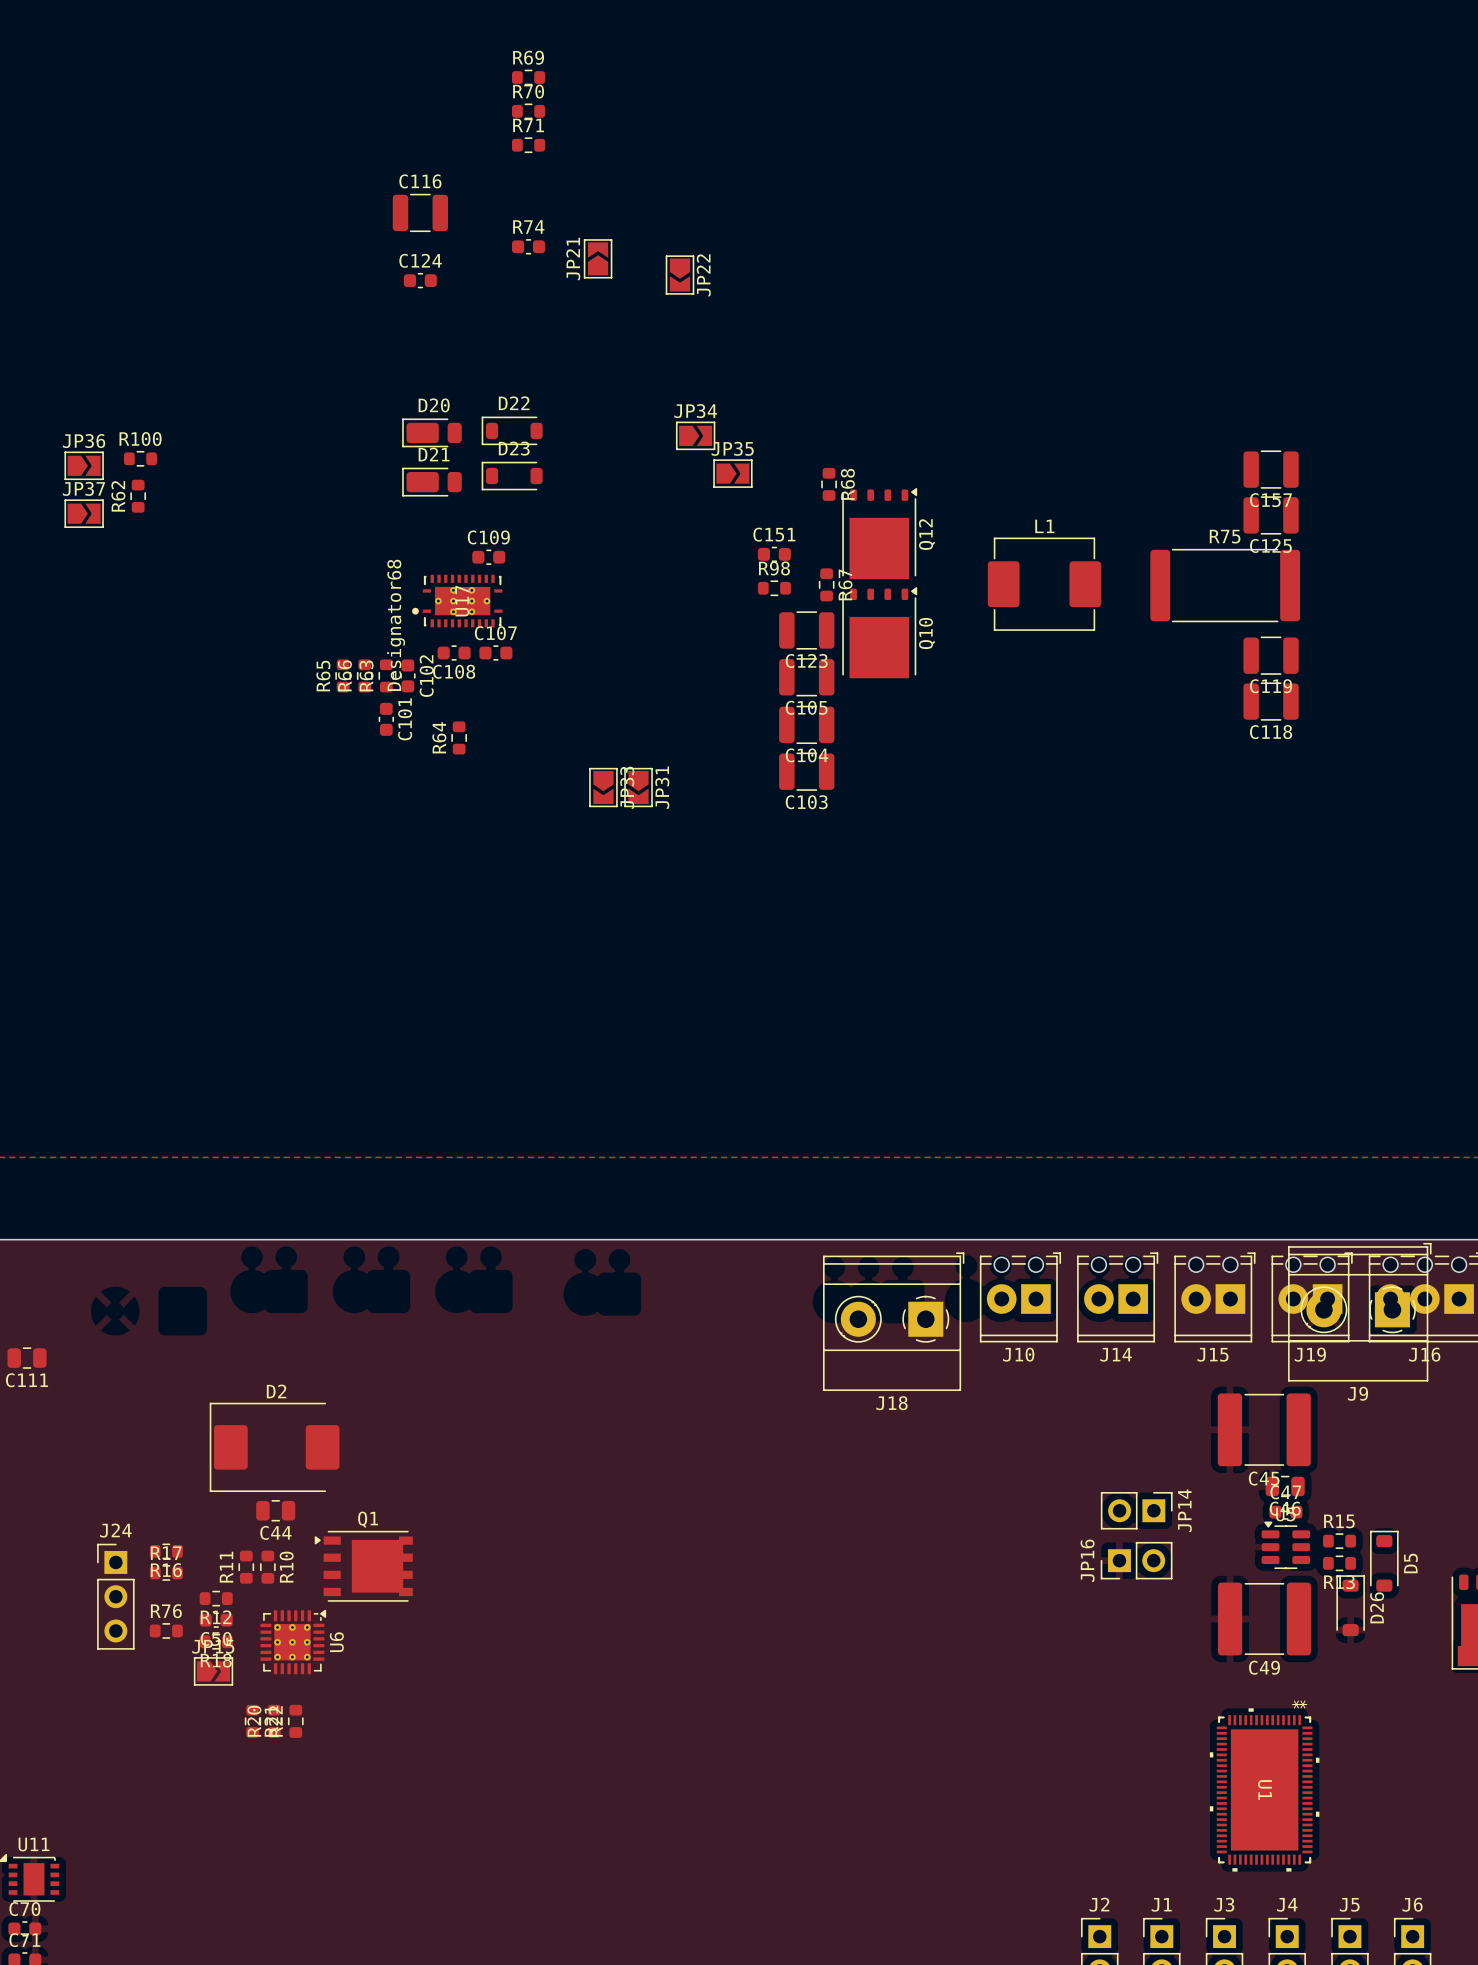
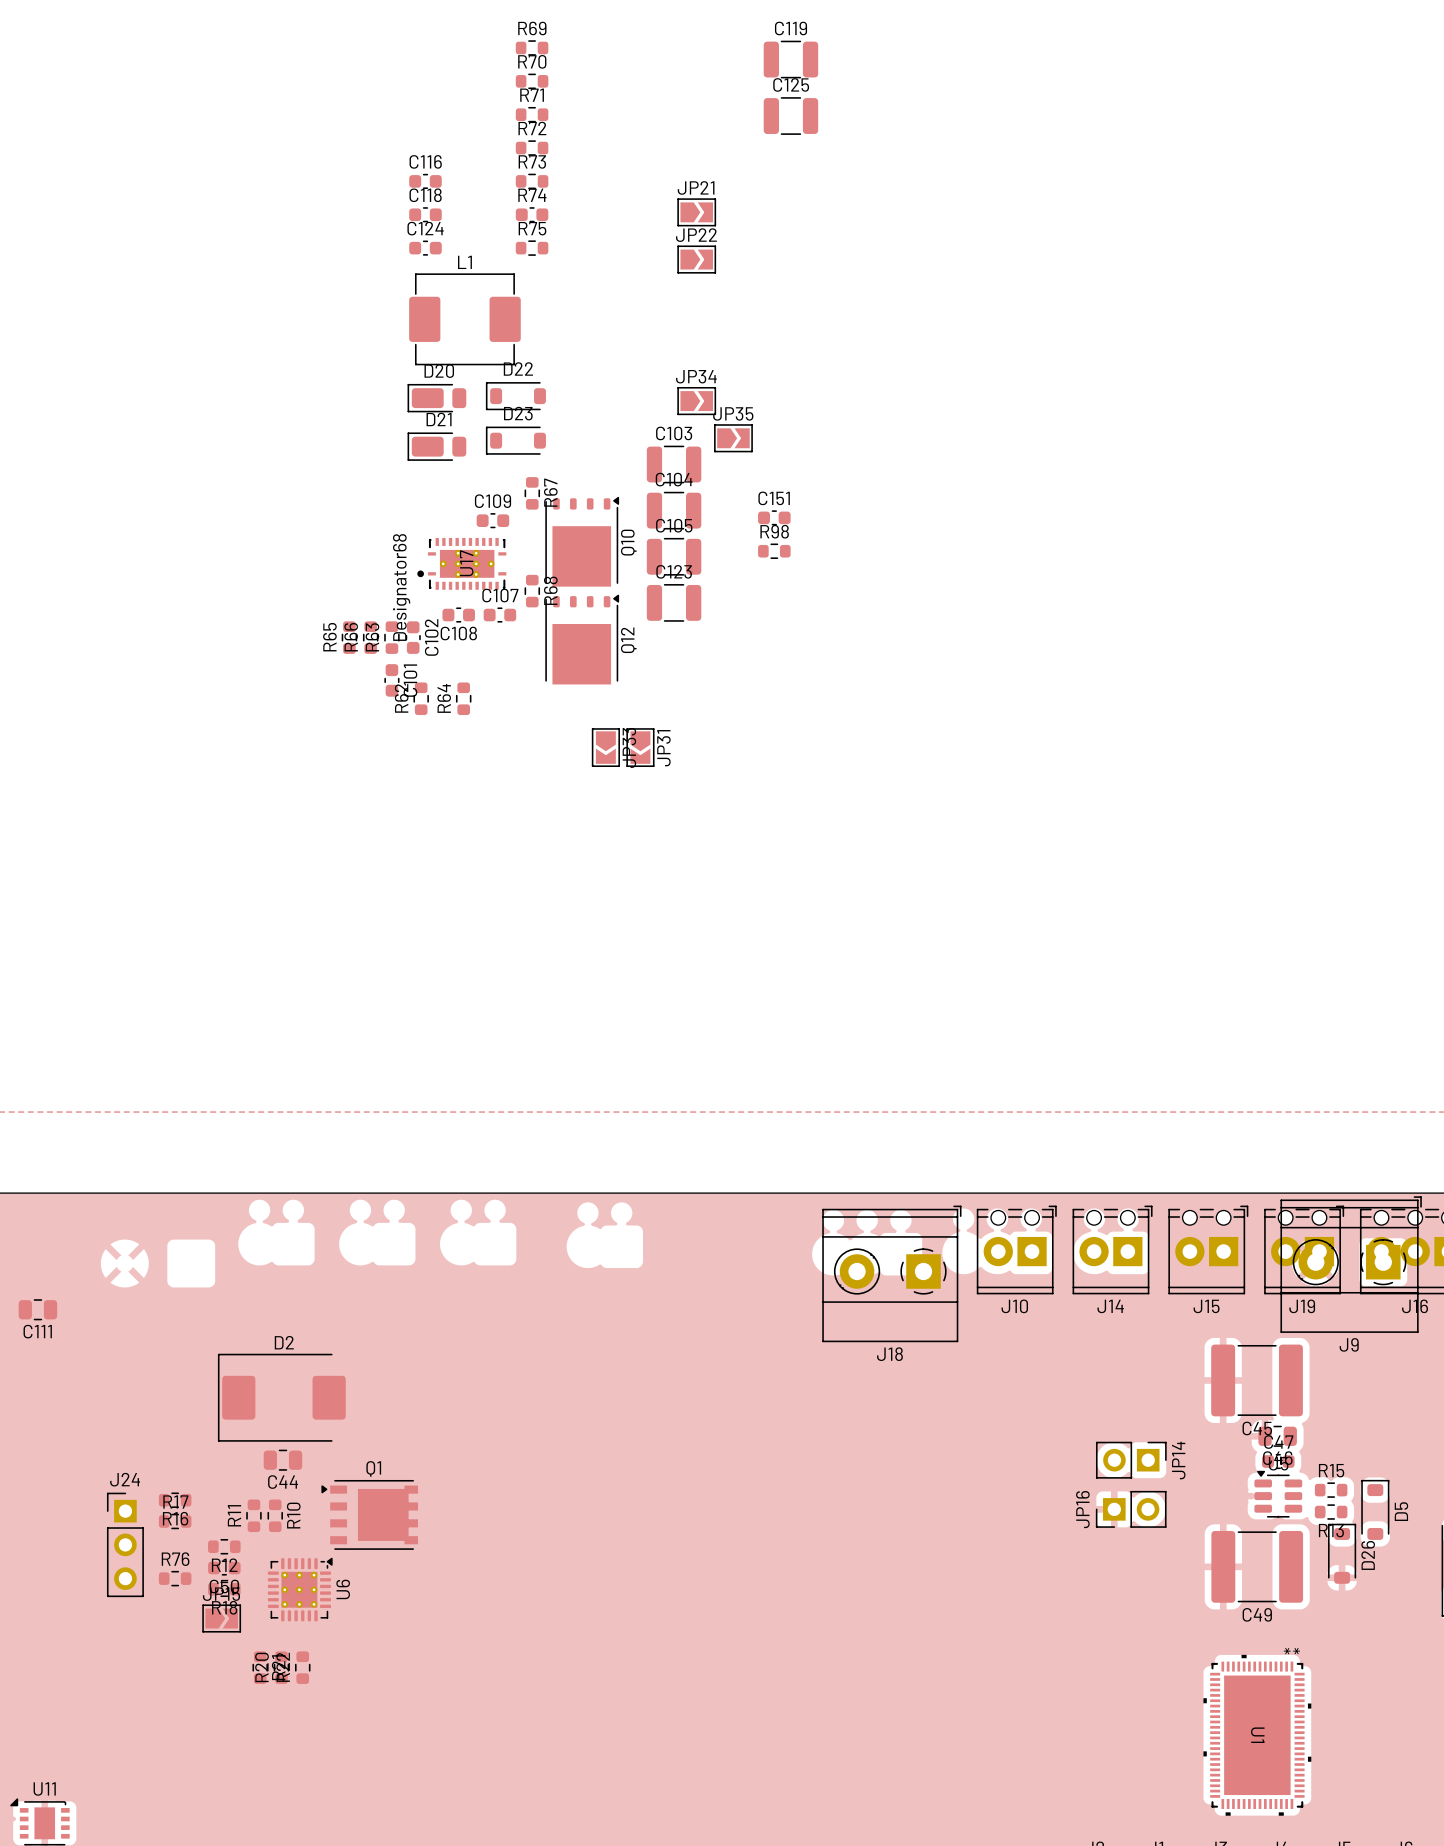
R72: none -> (532, 148)
C116 footprint: [392, 193, 449, 233] -> [409, 173, 442, 189]
R73: none -> (532, 181)
JP21 rotation: 0° (598, 258) -> 90° clockwise (696, 212)
JP21 position: (598, 258) -> (696, 212)
JP22 rotation: 0° (679, 275) -> 90° counterclockwise (696, 259)
R100: (140, 458) -> none
JP36: (84, 465) -> none
C157: (1271, 469) -> none
R68 position: (829, 484) -> (532, 591)
R62 position: (138, 496) -> (421, 698)
JP37: (84, 513) -> none
C125 position: (1271, 515) -> (790, 116)
Q12 position: (879, 533) -> (582, 639)
R75 name position: R75 (1225, 536) -> R75 (532, 228)
C125 name position: C125 (1270, 545) -> C125 (791, 84)
R75 footprint: [1150, 548, 1301, 623] -> [515, 240, 549, 256]
R67 position: (826, 584) -> (532, 493)
L1 position: (1044, 584) -> (464, 319)
C123 position: (806, 630) -> (674, 602)
Q10 position: (879, 632) -> (582, 541)
C119 position: (1271, 655) -> (790, 59)
C123 name position: C123 (806, 660) -> C123 (674, 571)
C105 position: (806, 677) -> (674, 556)
C118 footprint: [1243, 682, 1299, 721] -> [409, 207, 442, 223]
C119 name position: C119 (1271, 686) -> C119 (791, 28)
C105 name position: C105 (806, 707) -> C105 (674, 525)
C104 position: (806, 724) -> (674, 510)
C118 name position: C118 (1271, 732) -> C118 (425, 195)
C104 name position: C104 (806, 755) -> C104 (674, 479)
C103 position: (806, 771) -> (674, 464)
C103 name position: C103 (806, 802) -> C103 (674, 433)

